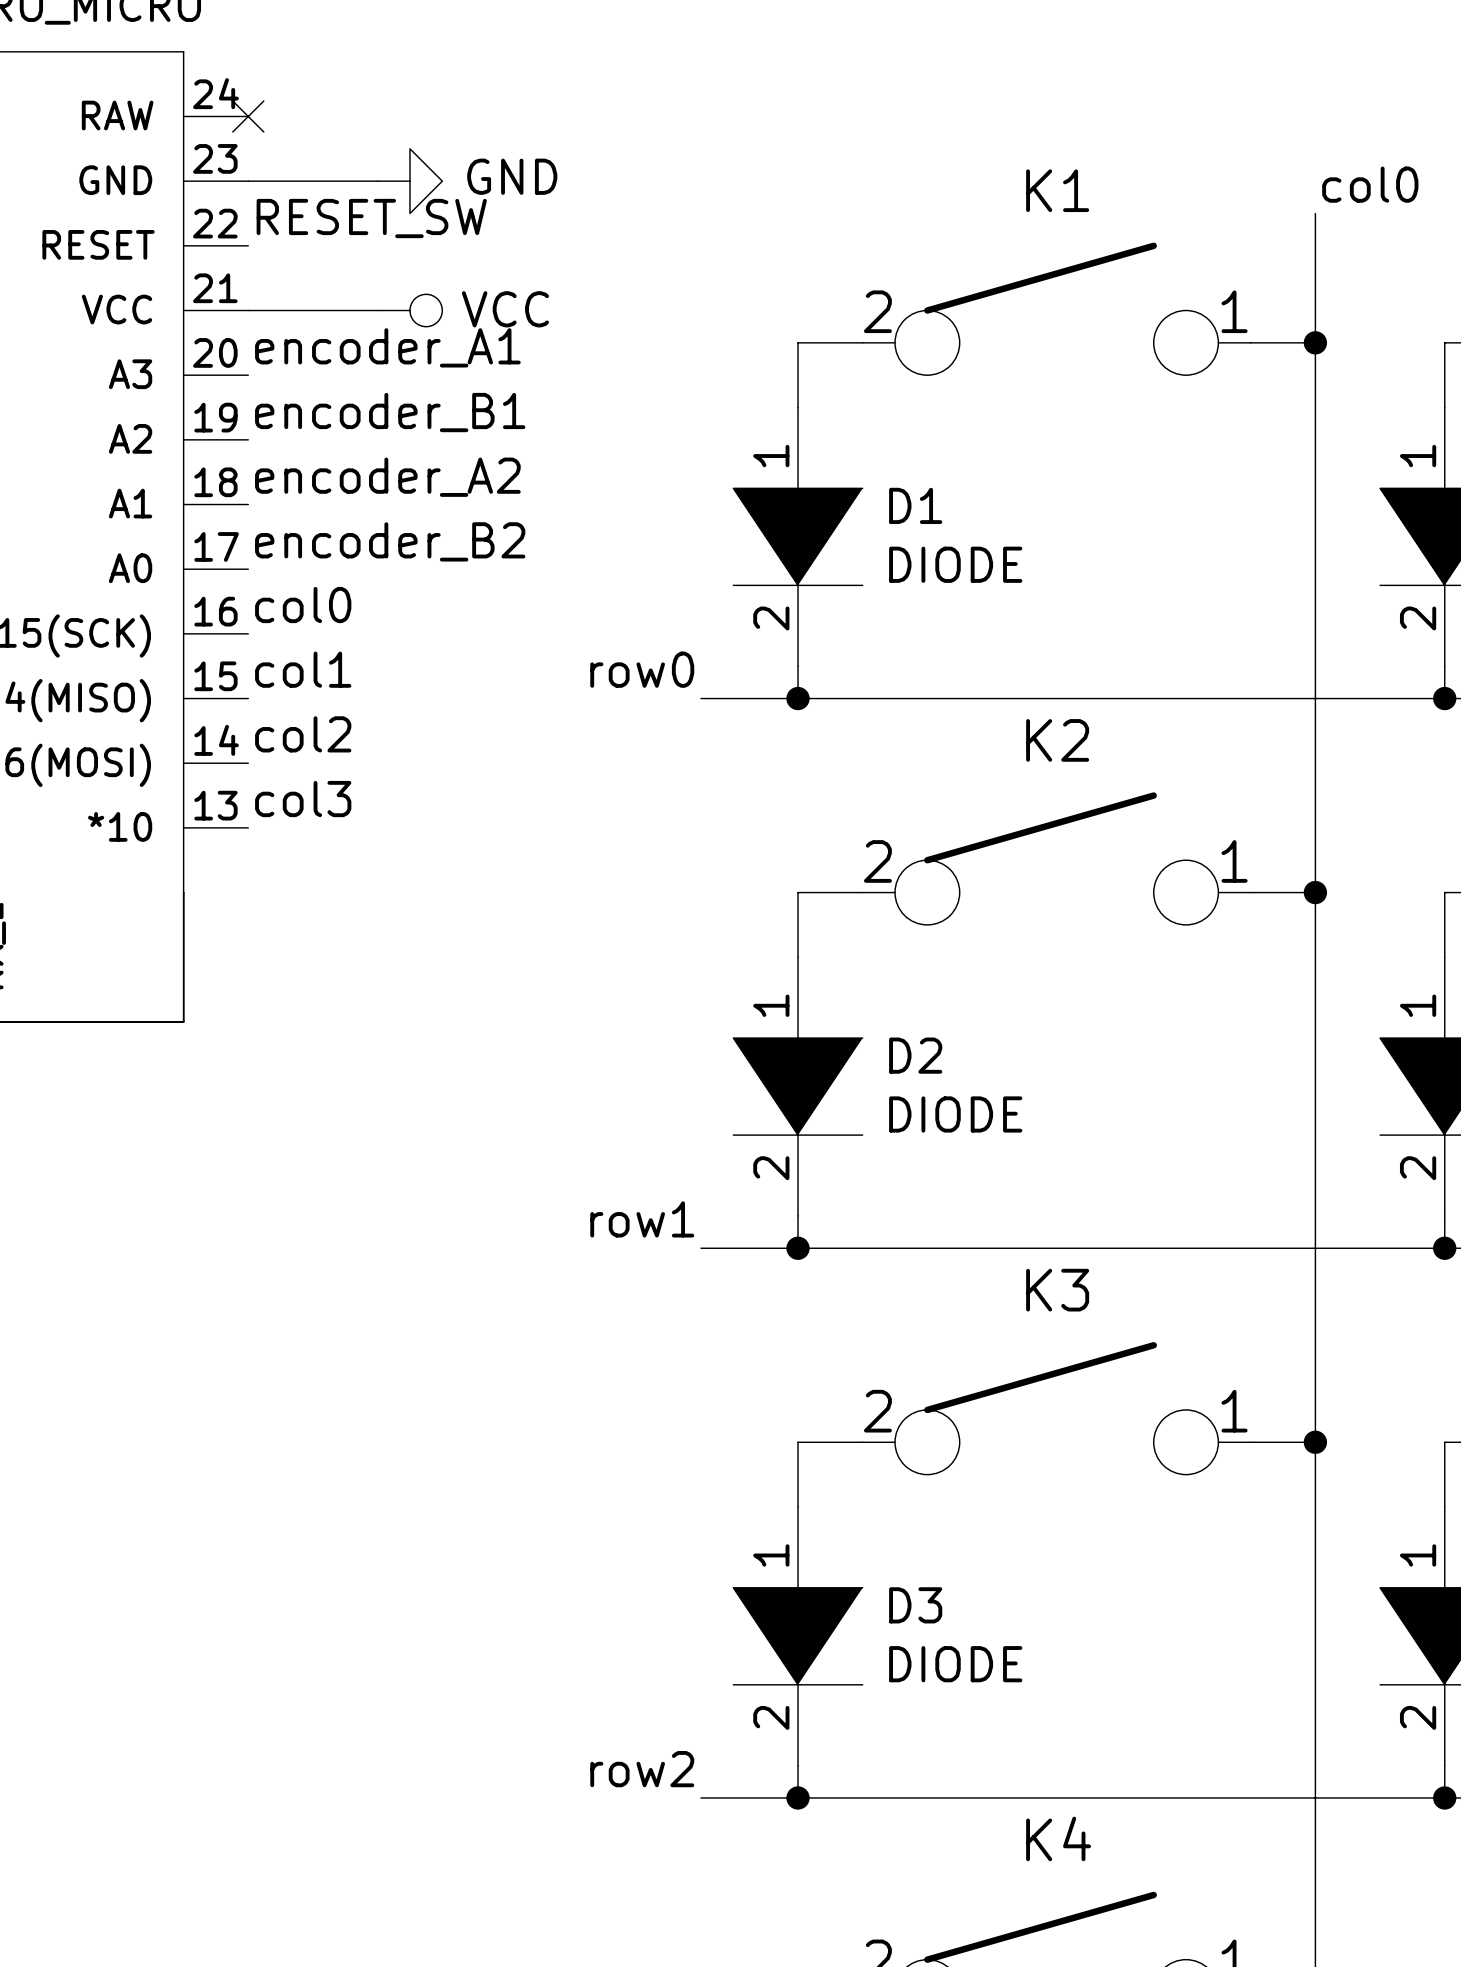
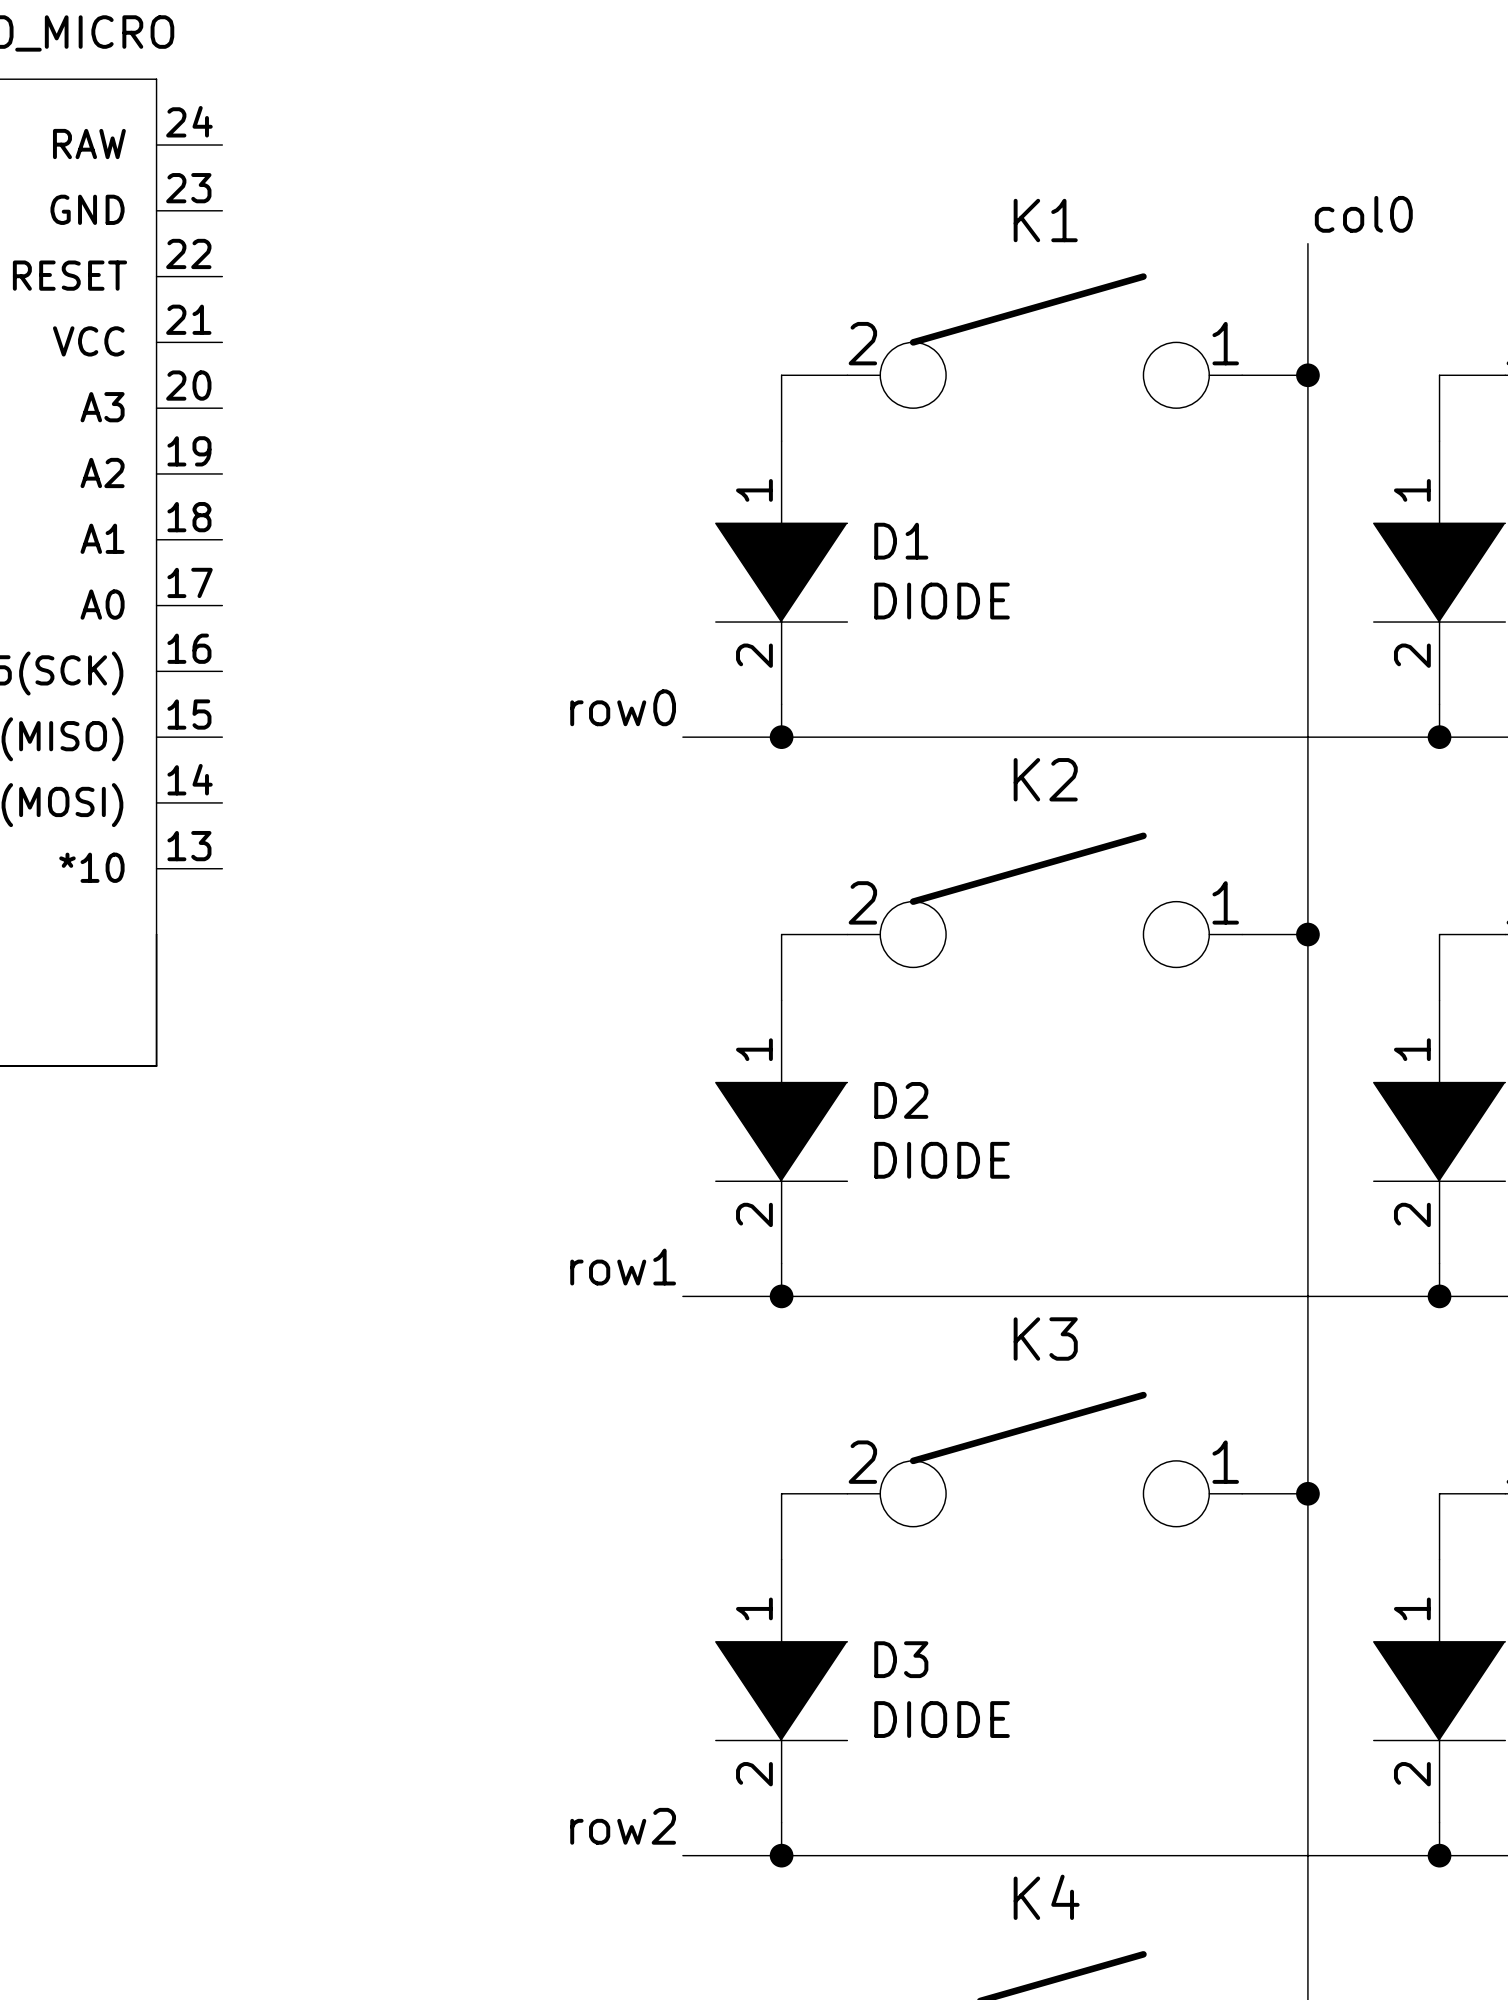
no-connect mark: (248, 116) -> none
wire: (248, 181) (377, 181) -> none
power symbol: GND (409, 181) -> none
label: RESET_SW (371, 218) -> none
wire: (248, 310) (377, 310) -> none
power symbol: VCC (409, 310) -> none
label: encoder_A1 (387, 347) -> none
label: encoder_B1 (390, 412) -> none
label: encoder_A2 (387, 477) -> none
label: encoder_B2 (390, 541) -> none
label: col0 (303, 605) -> none
label: col1 (303, 669) -> none
label: col2 (303, 734) -> none
label: col3 (303, 799) -> none

